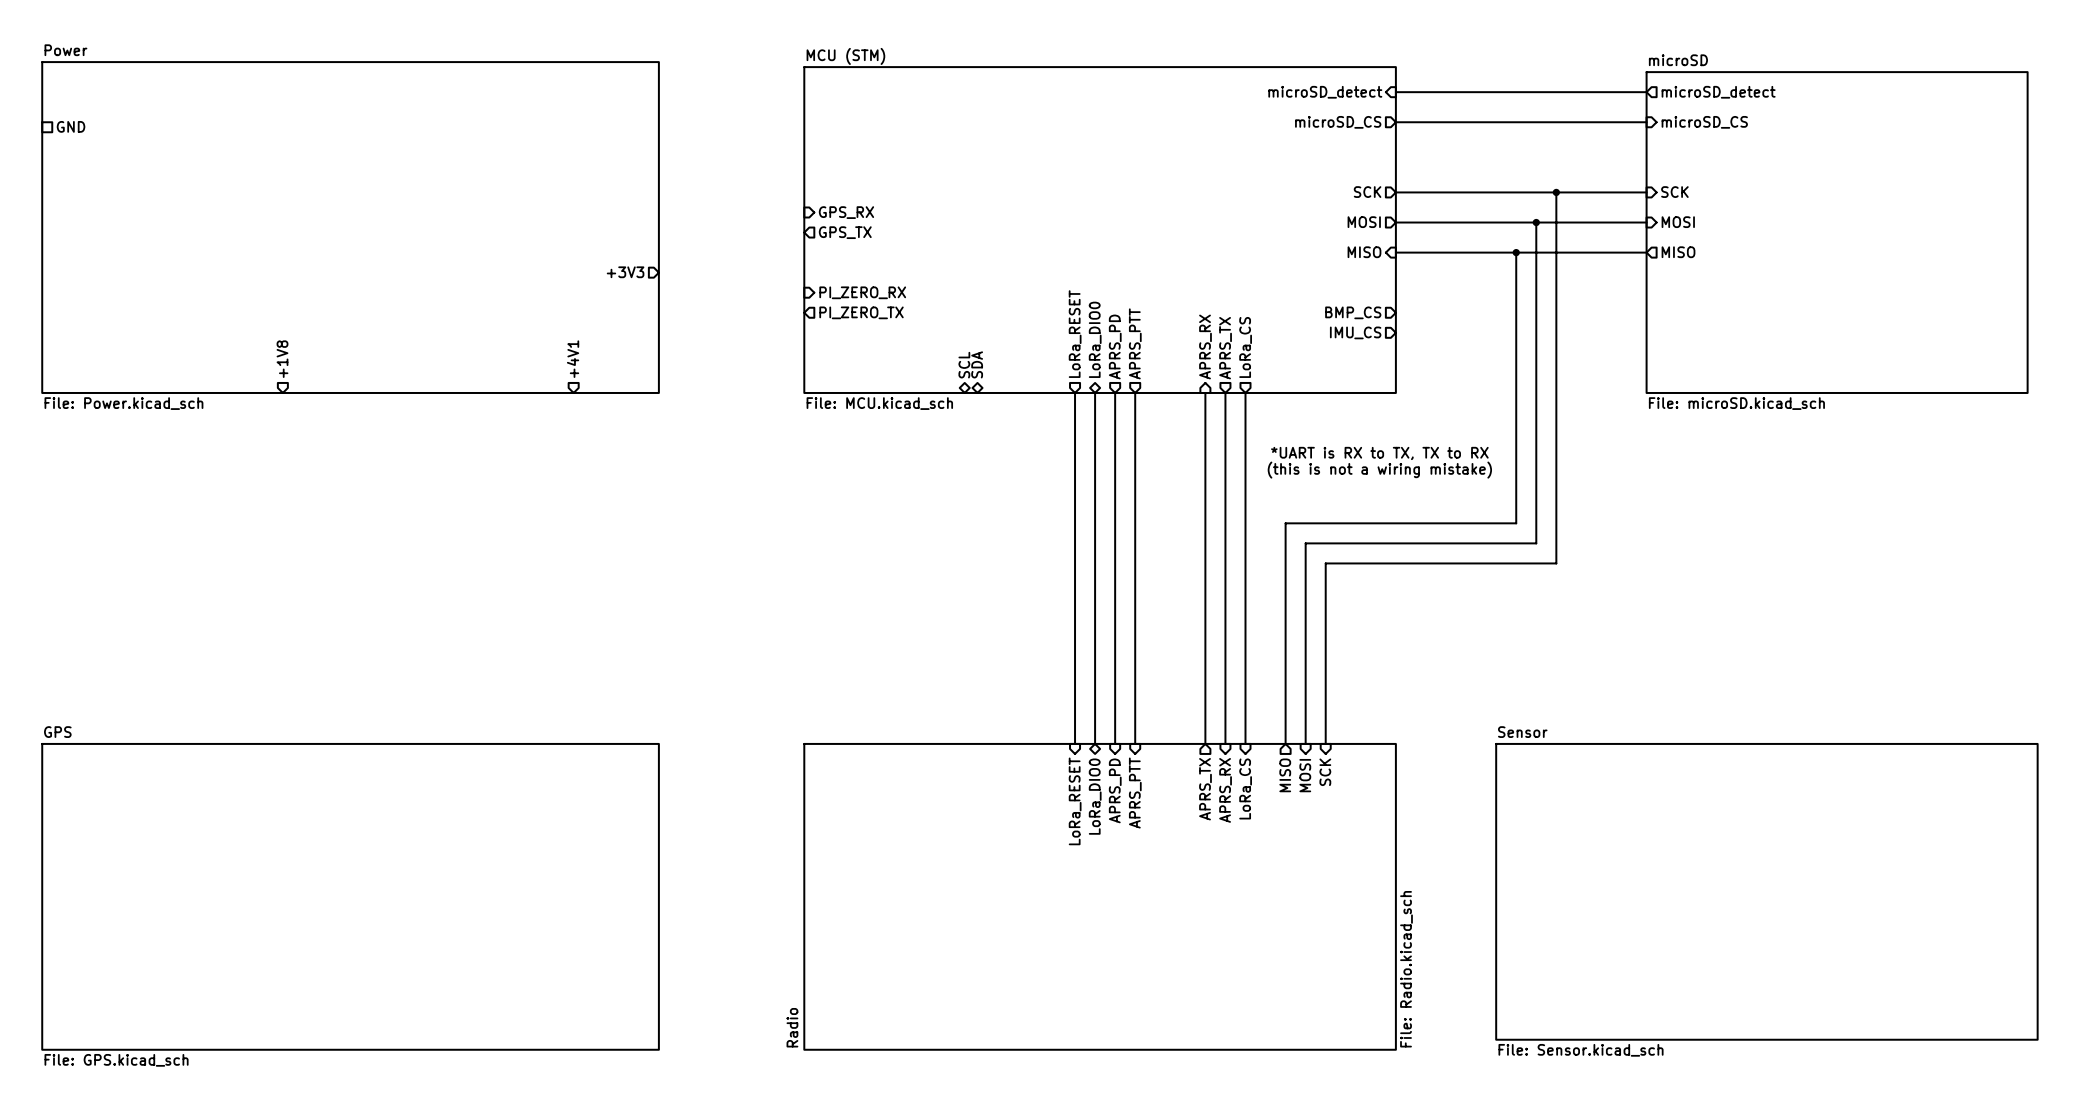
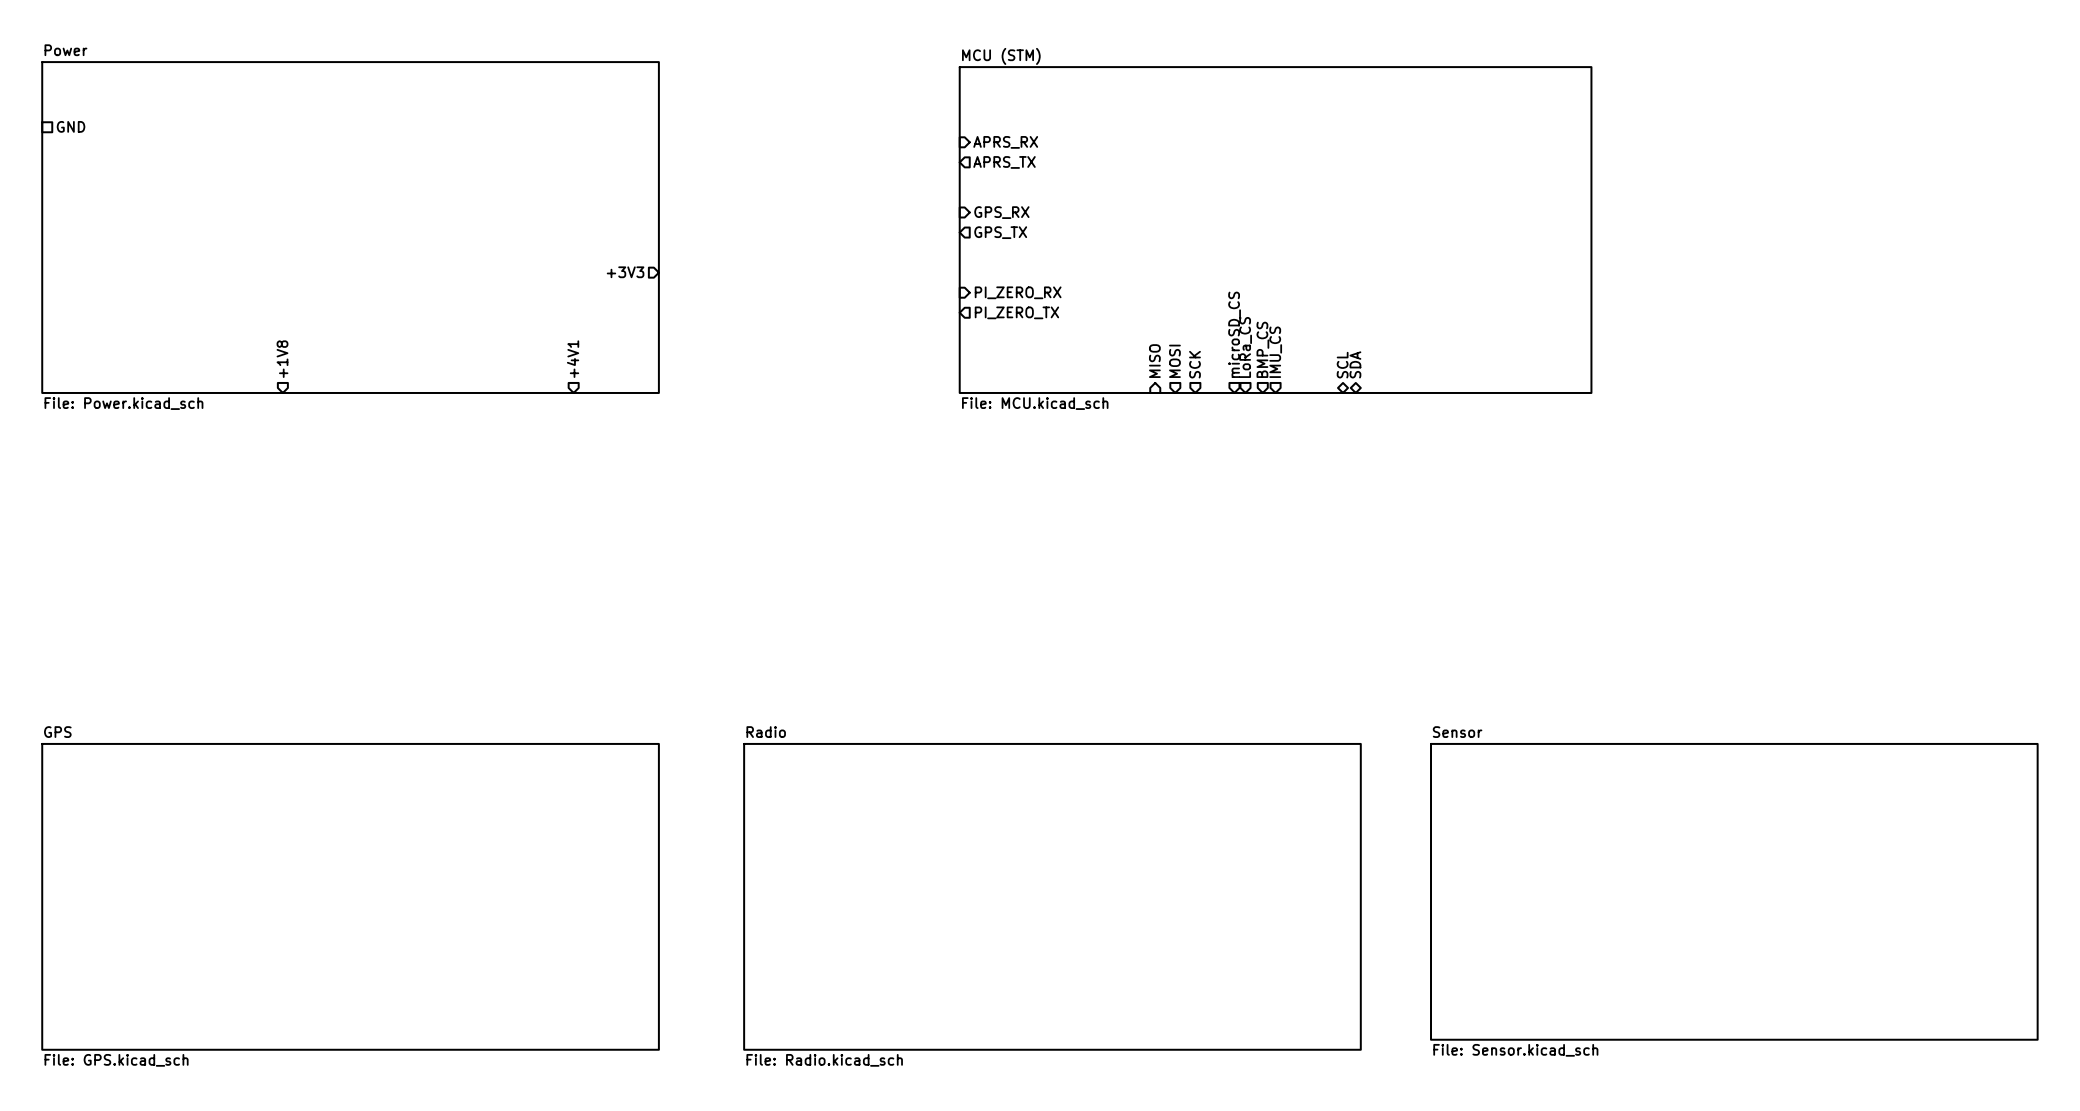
sheet pin: microSD_detect (1325, 92) -> none
wire: (1395, 92) (1646, 92) -> none
sheet pin: microSD_detect (1718, 92) -> none
sheet pin: microSD_CS (1338, 122) -> none
wire: (1395, 122) (1646, 122) -> none
sheet pin: microSD_CS (1704, 122) -> none
sheet pin: none -> APRS_RX (1005, 142)
sheet pin: none -> APRS_TX (1004, 162)
sheet pin: SCK (1367, 192) -> none
wire: (1395, 192) (1646, 192) -> none
wire: (1556, 192) (1556, 563) (1325, 563) (1325, 743) -> none
junction: (1556, 192) -> none
sheet pin: SCK (1674, 192) -> none
sheet pin position: GPS_RX (846, 212) -> GPS_RX (1001, 212)
sheet pin: MOSI (1364, 222) -> none
wire: (1395, 222) (1646, 222) -> none
wire: (1536, 222) (1536, 543) (1305, 543) (1305, 743) -> none
junction: (1536, 222) -> none
sheet pin: MOSI (1678, 222) -> none
sheet MCU (STM): File: MCU.kicad_sch (1100, 230) -> none
sheet MCU (STM): none -> File: MCU.kicad_sch (1275, 230)
sheet pin position: GPS_TX (845, 232) -> GPS_TX (1000, 232)
sheet microSD: File: microSD.kicad_sch (1837, 232) -> none
sheet pin: MISO (1364, 252) -> none
wire: (1395, 252) (1646, 252) -> none
wire: (1516, 252) (1516, 523) (1285, 523) (1285, 743) -> none
junction: (1516, 252) -> none
sheet pin: MISO (1678, 252) -> none
sheet pin position: PI_ZERO_RX (862, 292) -> PI_ZERO_RX (1018, 292)
sheet pin position: PI_ZERO_TX (861, 312) -> PI_ZERO_TX (1016, 312)
sheet pin rotation: 0° (1353, 312) -> 90° clockwise (1262, 349)
sheet pin position: BMP_CS (1353, 312) -> BMP_CS (1262, 349)
sheet pin rotation: 0° (1355, 332) -> 90° clockwise (1275, 352)
sheet pin position: IMU_CS (1355, 332) -> IMU_CS (1275, 352)
sheet pin: LoRa_RESET (1075, 334) -> none
sheet pin: none -> microSD_CS (1234, 334)
sheet pin: LoRa_DIO0 (1095, 339) -> none
sheet pin: APRS_PTT (1135, 343) -> none
sheet pin: APRS_PD (1115, 346) -> none
sheet pin: APRS_RX (1205, 346) -> none
sheet pin: APRS_TX (1225, 348) -> none
sheet pin: none -> MISO (1154, 361)
sheet pin: none -> MOSI (1174, 361)
sheet pin: SDA (977, 364) -> none
sheet pin: none -> SCK (1194, 364)
sheet pin: none -> SDA (1355, 364)
sheet pin: SCL (964, 365) -> none
sheet pin: none -> SCL (1342, 365)
wire: (1075, 392) (1075, 743) -> none
wire: (1095, 392) (1095, 743) -> none
wire: (1115, 392) (1115, 743) -> none
wire: (1135, 392) (1135, 743) -> none
wire: (1205, 392) (1205, 743) -> none
wire: (1225, 392) (1225, 743) -> none
wire: (1245, 392) (1245, 743) -> none
text: *UART is RX to TX, TX to RX (1379, 453) -> none
text: (this is not a wiring mistake) (1379, 470) -> none
sheet pin: SCK (1325, 772) -> none
sheet pin: MISO (1285, 775) -> none
sheet pin: MOSI (1305, 775) -> none
sheet pin: LoRa_CS (1245, 788) -> none
sheet pin: APRS_TX (1205, 789) -> none
sheet pin: APRS_PD (1115, 790) -> none
sheet pin: APRS_RX (1225, 790) -> none
sheet pin: APRS_PTT (1135, 793) -> none
sheet pin: LoRa_DIO0 (1095, 796) -> none
sheet pin: LoRa_RESET (1075, 801) -> none
sheet Sensor: none -> File: Sensor.kicad_sch (1734, 891)
sheet Sensor: File: Sensor.kicad_sch (1766, 891) -> none
sheet Radio: none -> File: Radio.kicad_sch (1052, 896)
sheet Radio: File: Radio.kicad_sch (1100, 896) -> none

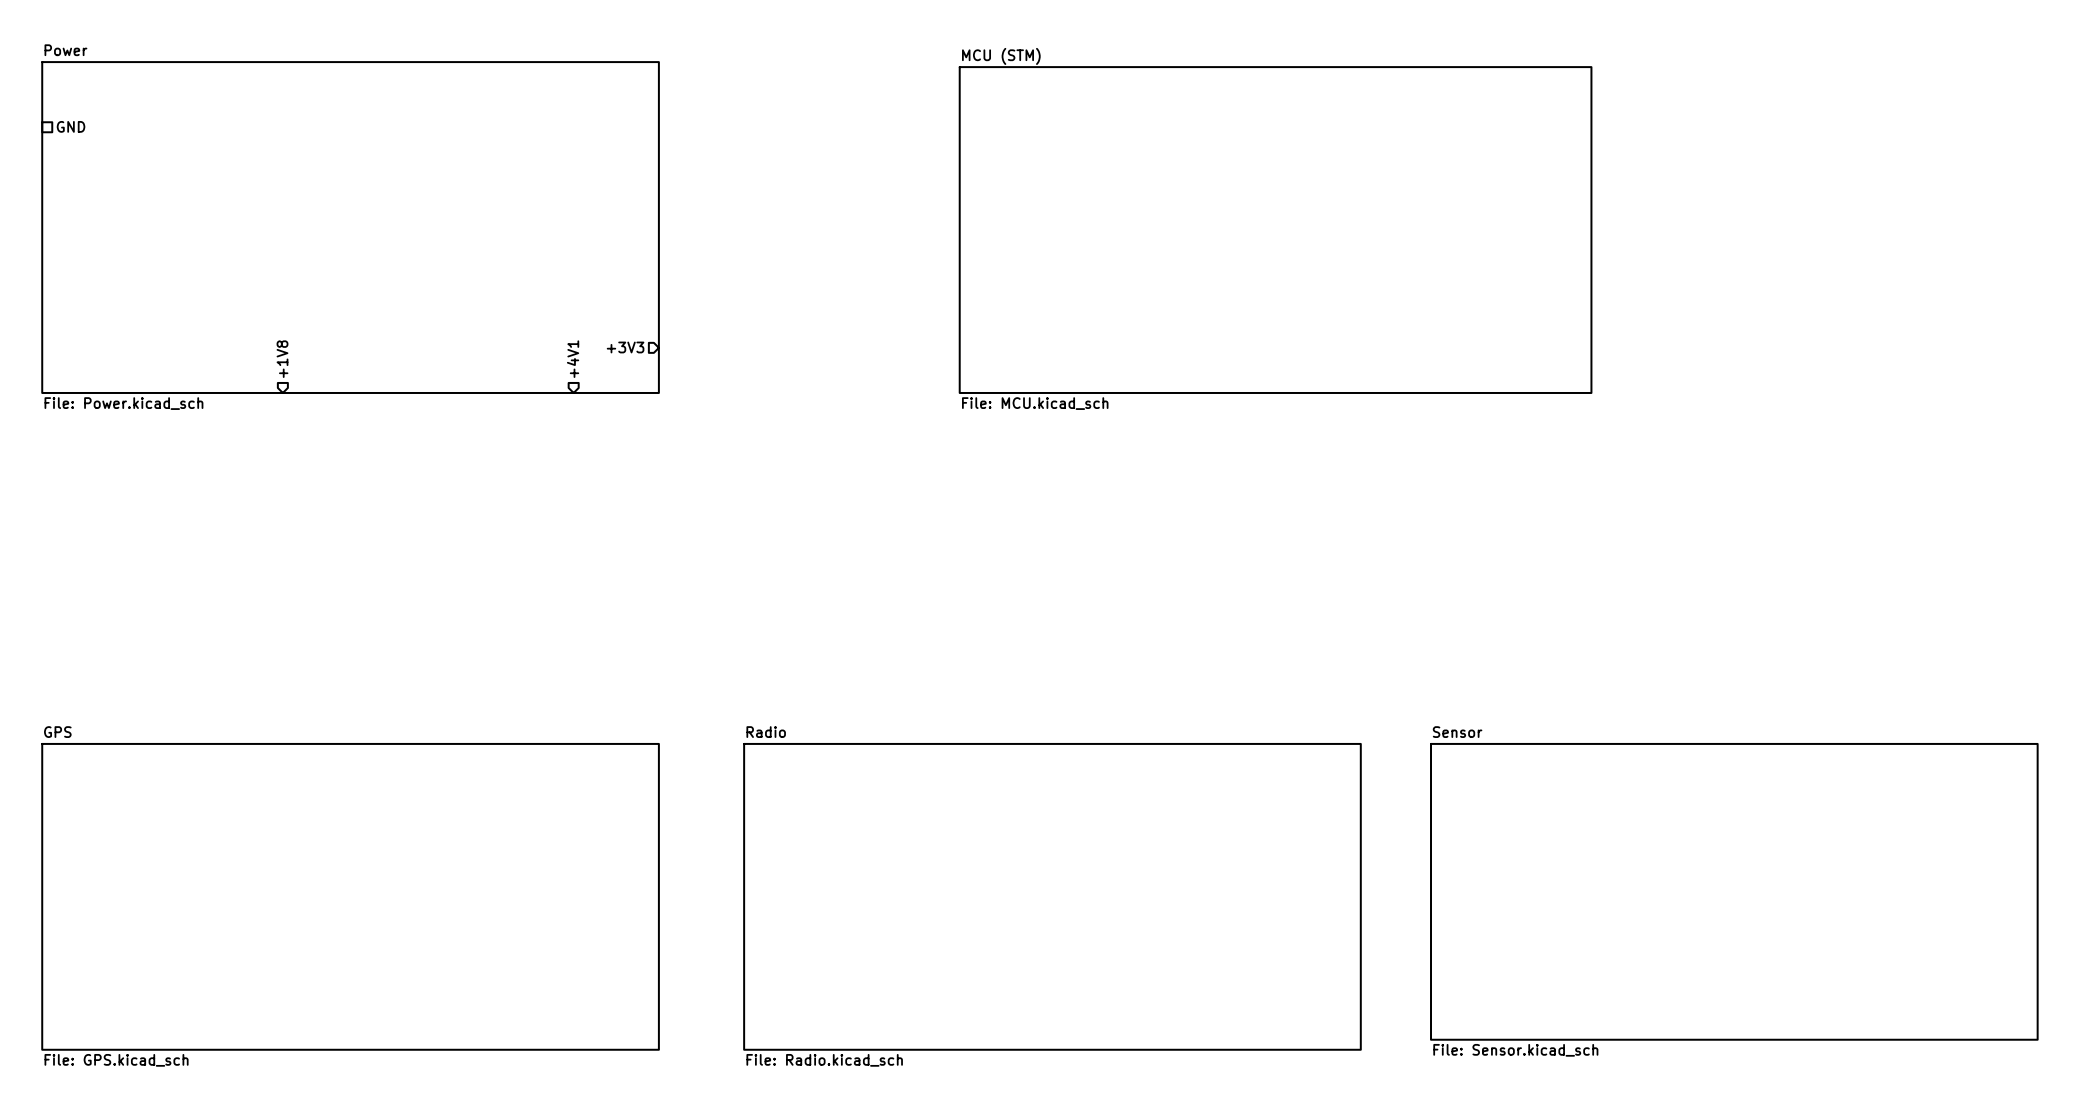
sheet pin: APRS_RX (1005, 142) -> none
sheet pin: APRS_TX (1004, 162) -> none
sheet pin: GPS_RX (1001, 212) -> none
sheet pin: GPS_TX (1000, 232) -> none
sheet pin position: +3V3 (625, 272) -> +3V3 (625, 347)
sheet pin: PI_ZERO_RX (1018, 292) -> none
sheet pin: PI_ZERO_TX (1016, 312) -> none
sheet pin: microSD_CS (1234, 334) -> none
sheet pin: LoRa_CS (1245, 347) -> none
sheet pin: BMP_CS (1262, 349) -> none
sheet pin: IMU_CS (1275, 352) -> none
sheet pin: MISO (1154, 361) -> none
sheet pin: MOSI (1174, 361) -> none
sheet pin: SCK (1194, 364) -> none
sheet pin: SDA (1355, 364) -> none
sheet pin: SCL (1342, 365) -> none

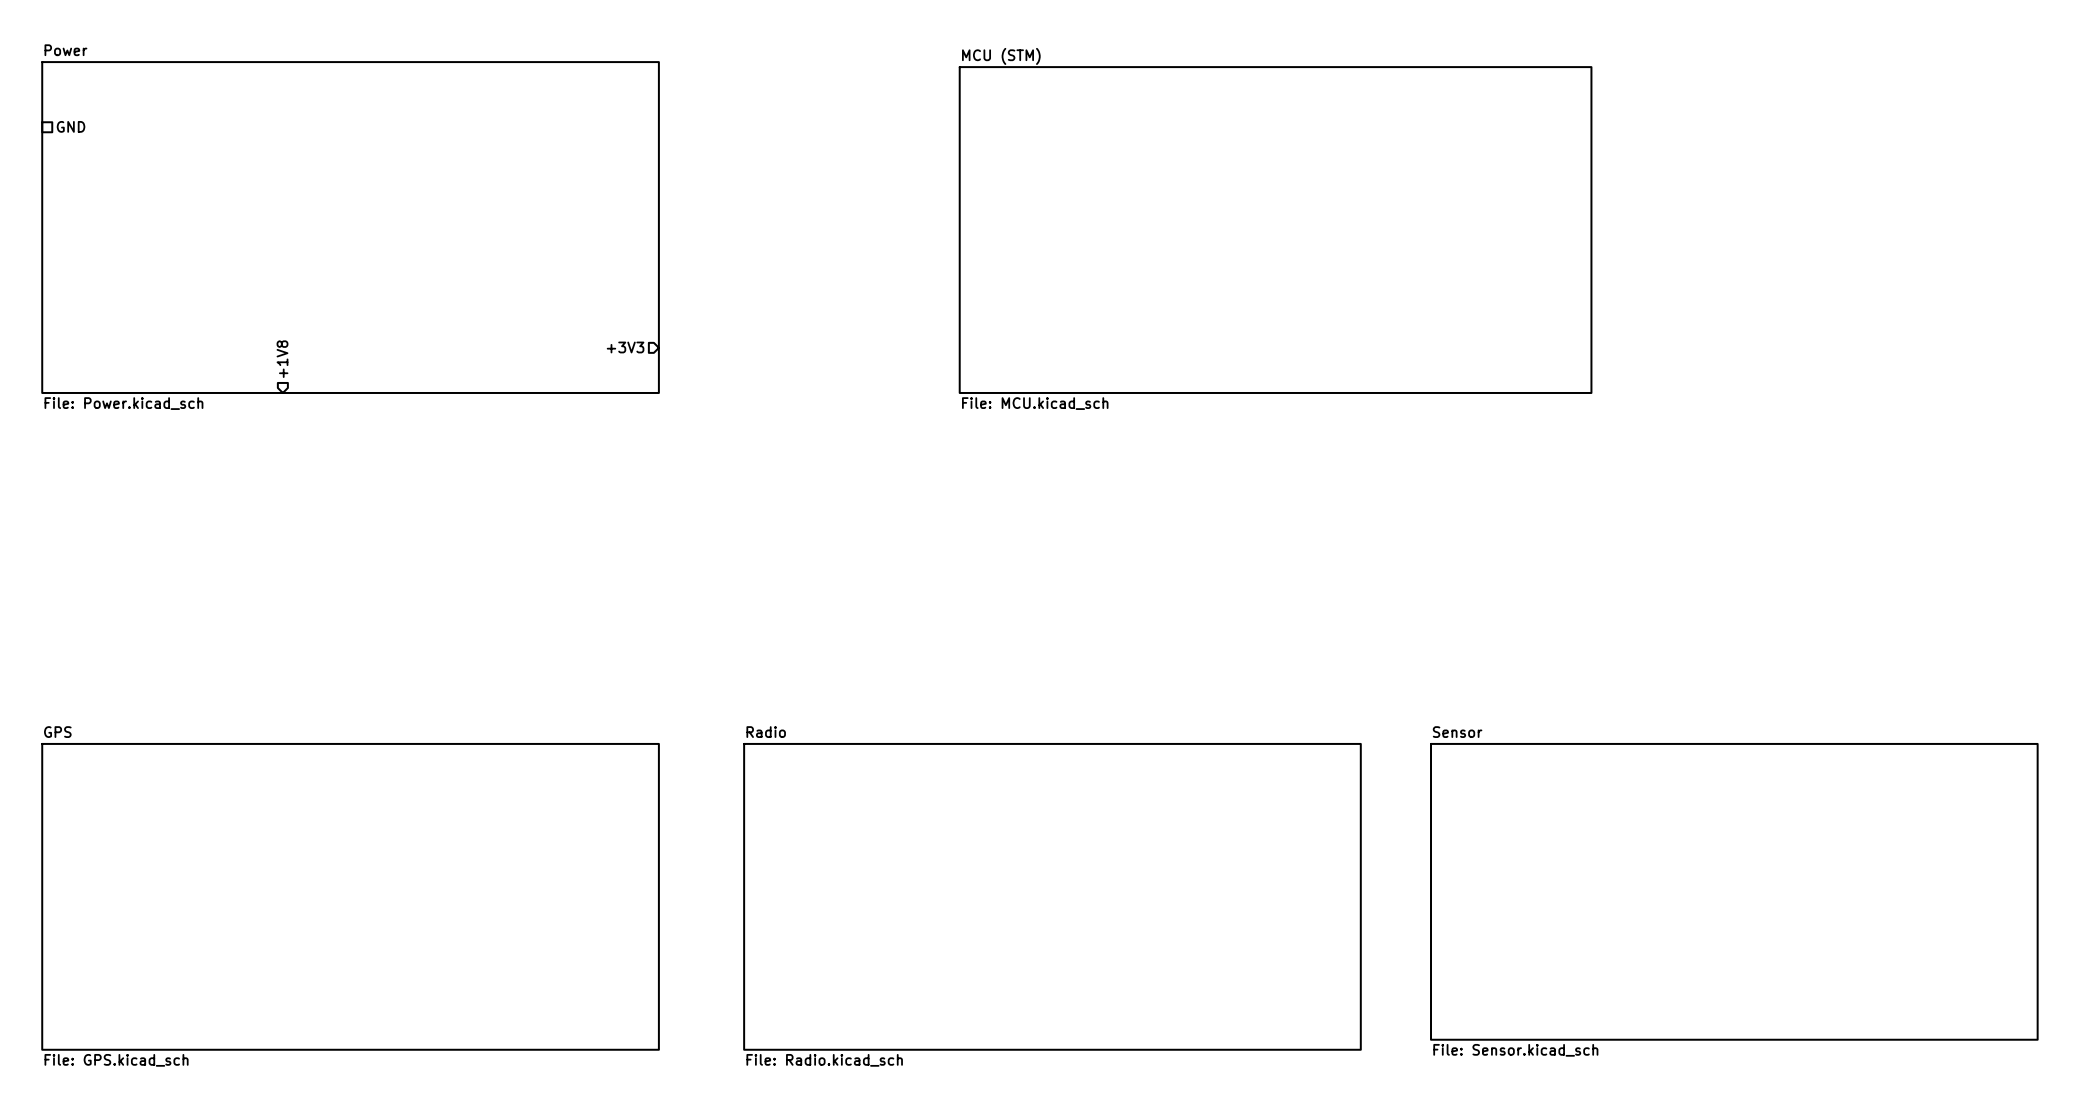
sheet pin: +4V1 (573, 359) -> none

